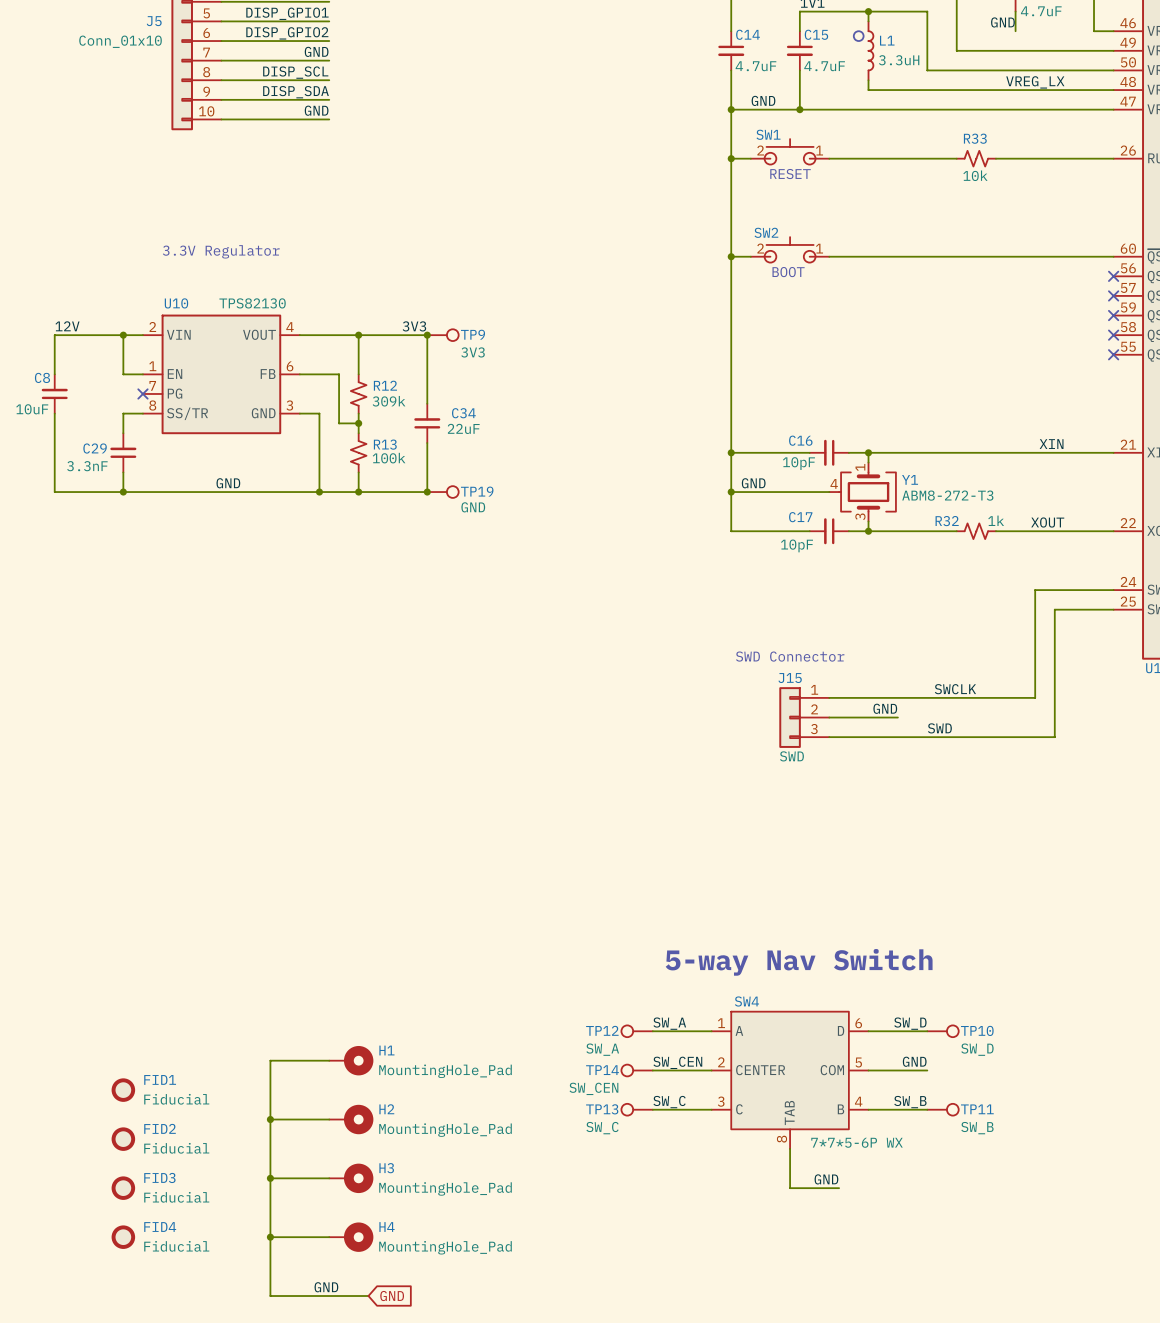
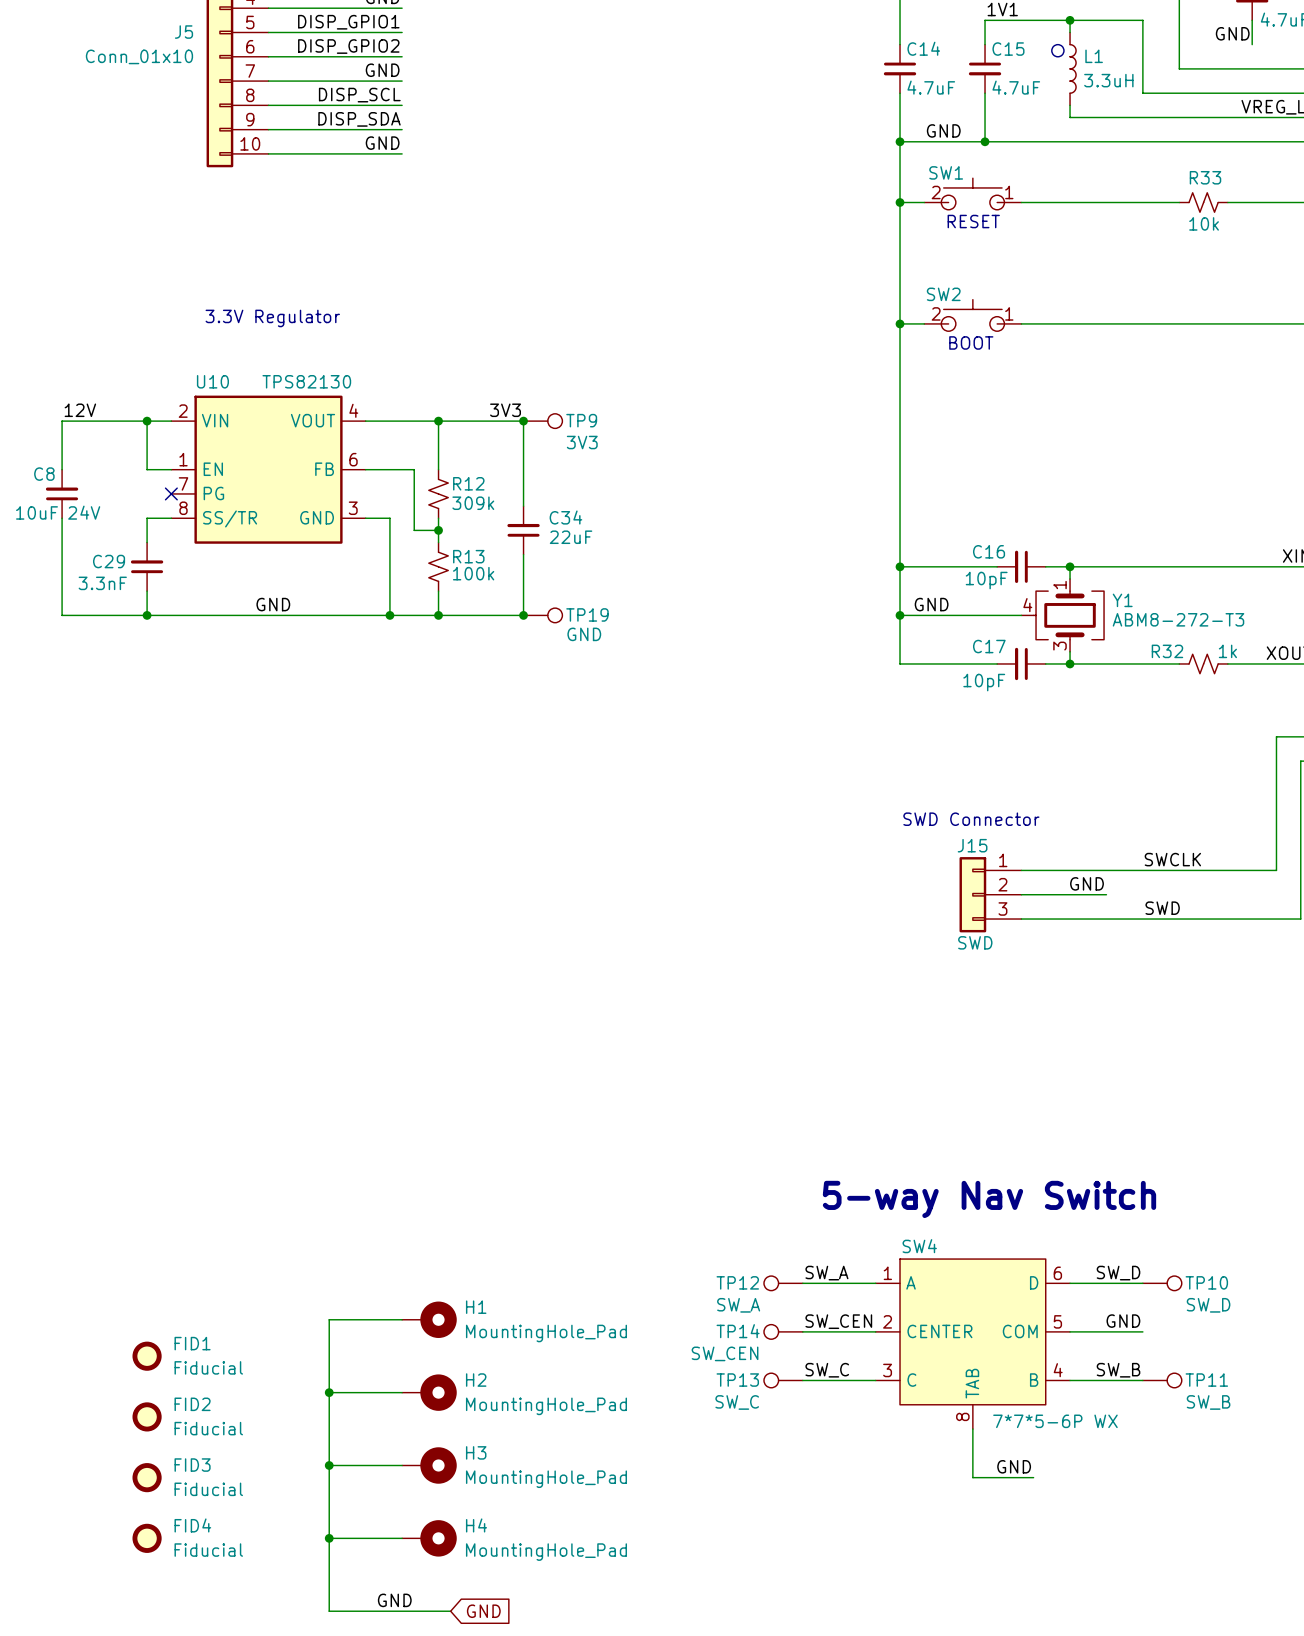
C8 text: none -> 24V (84, 512)

